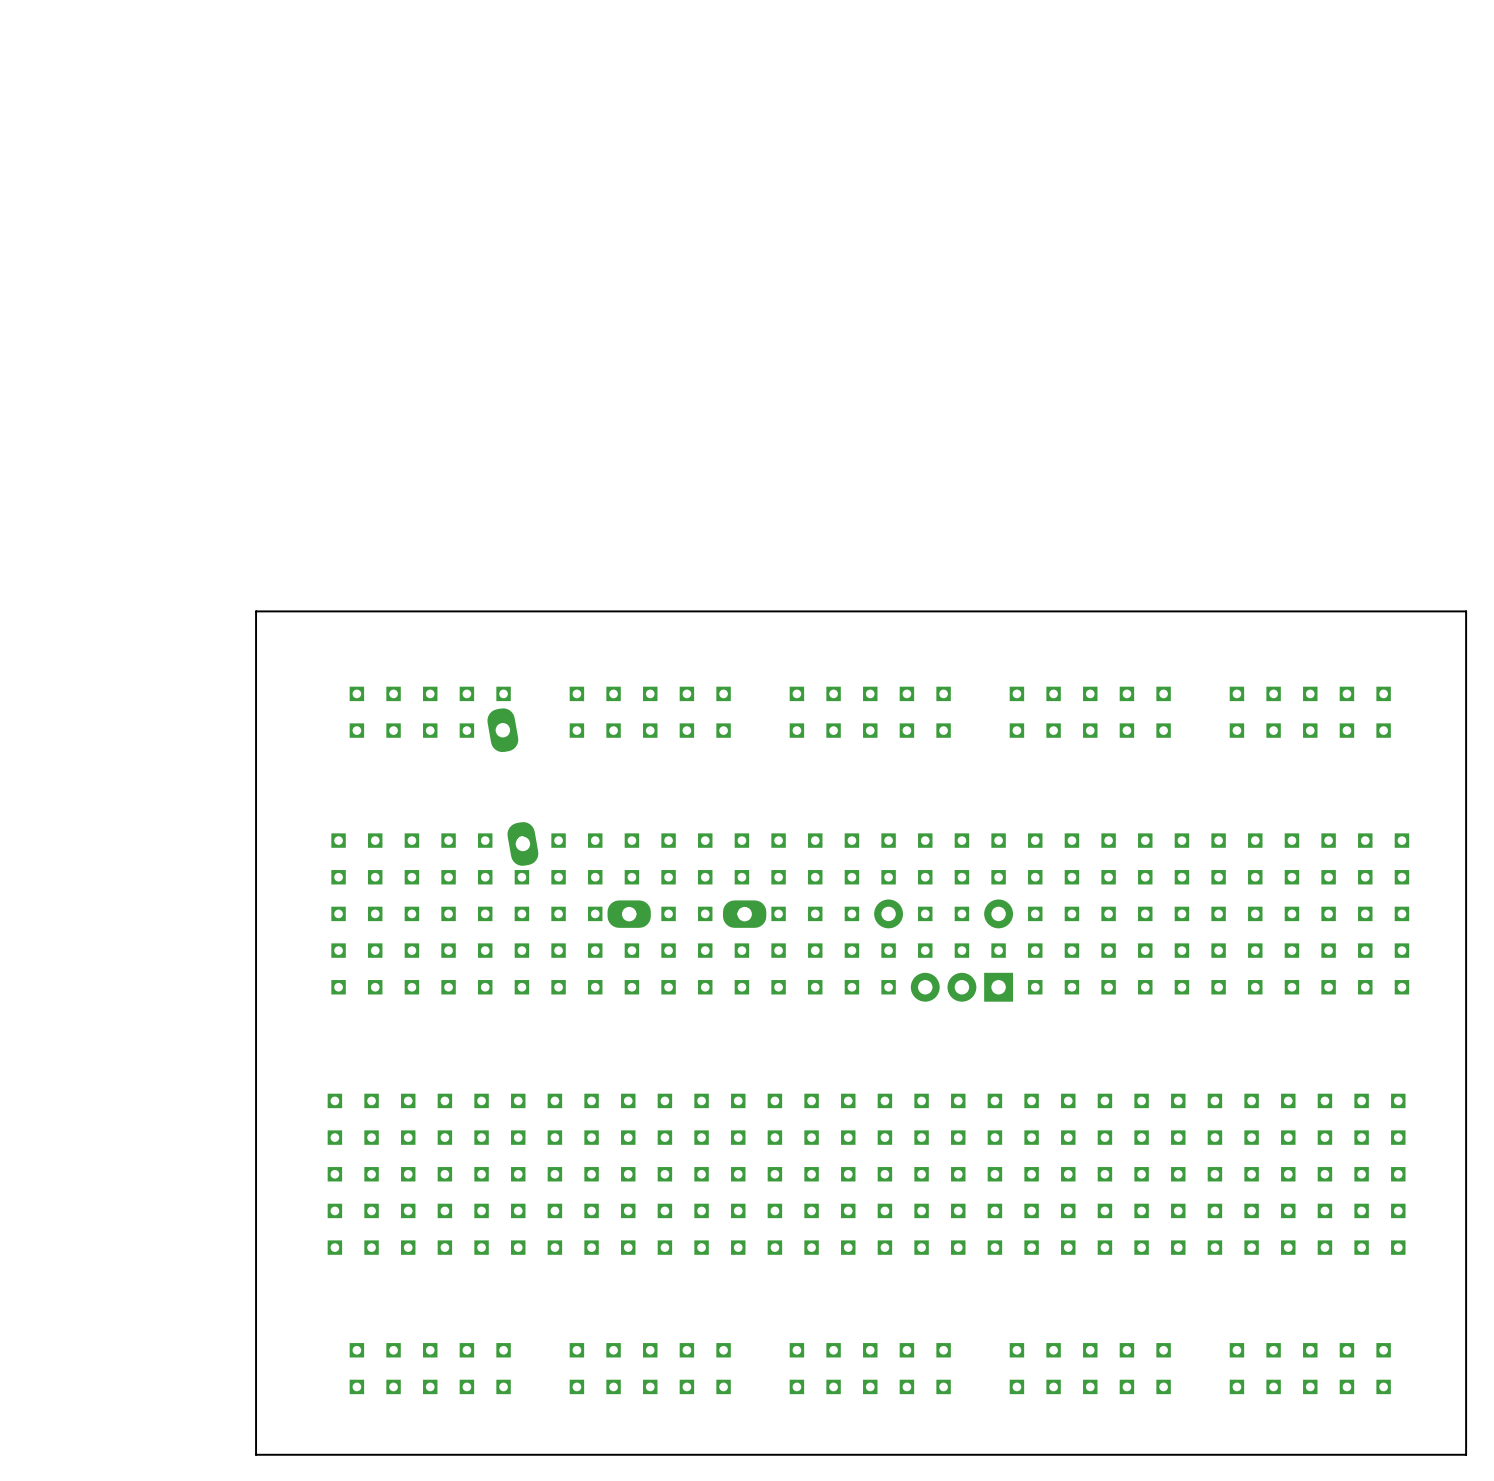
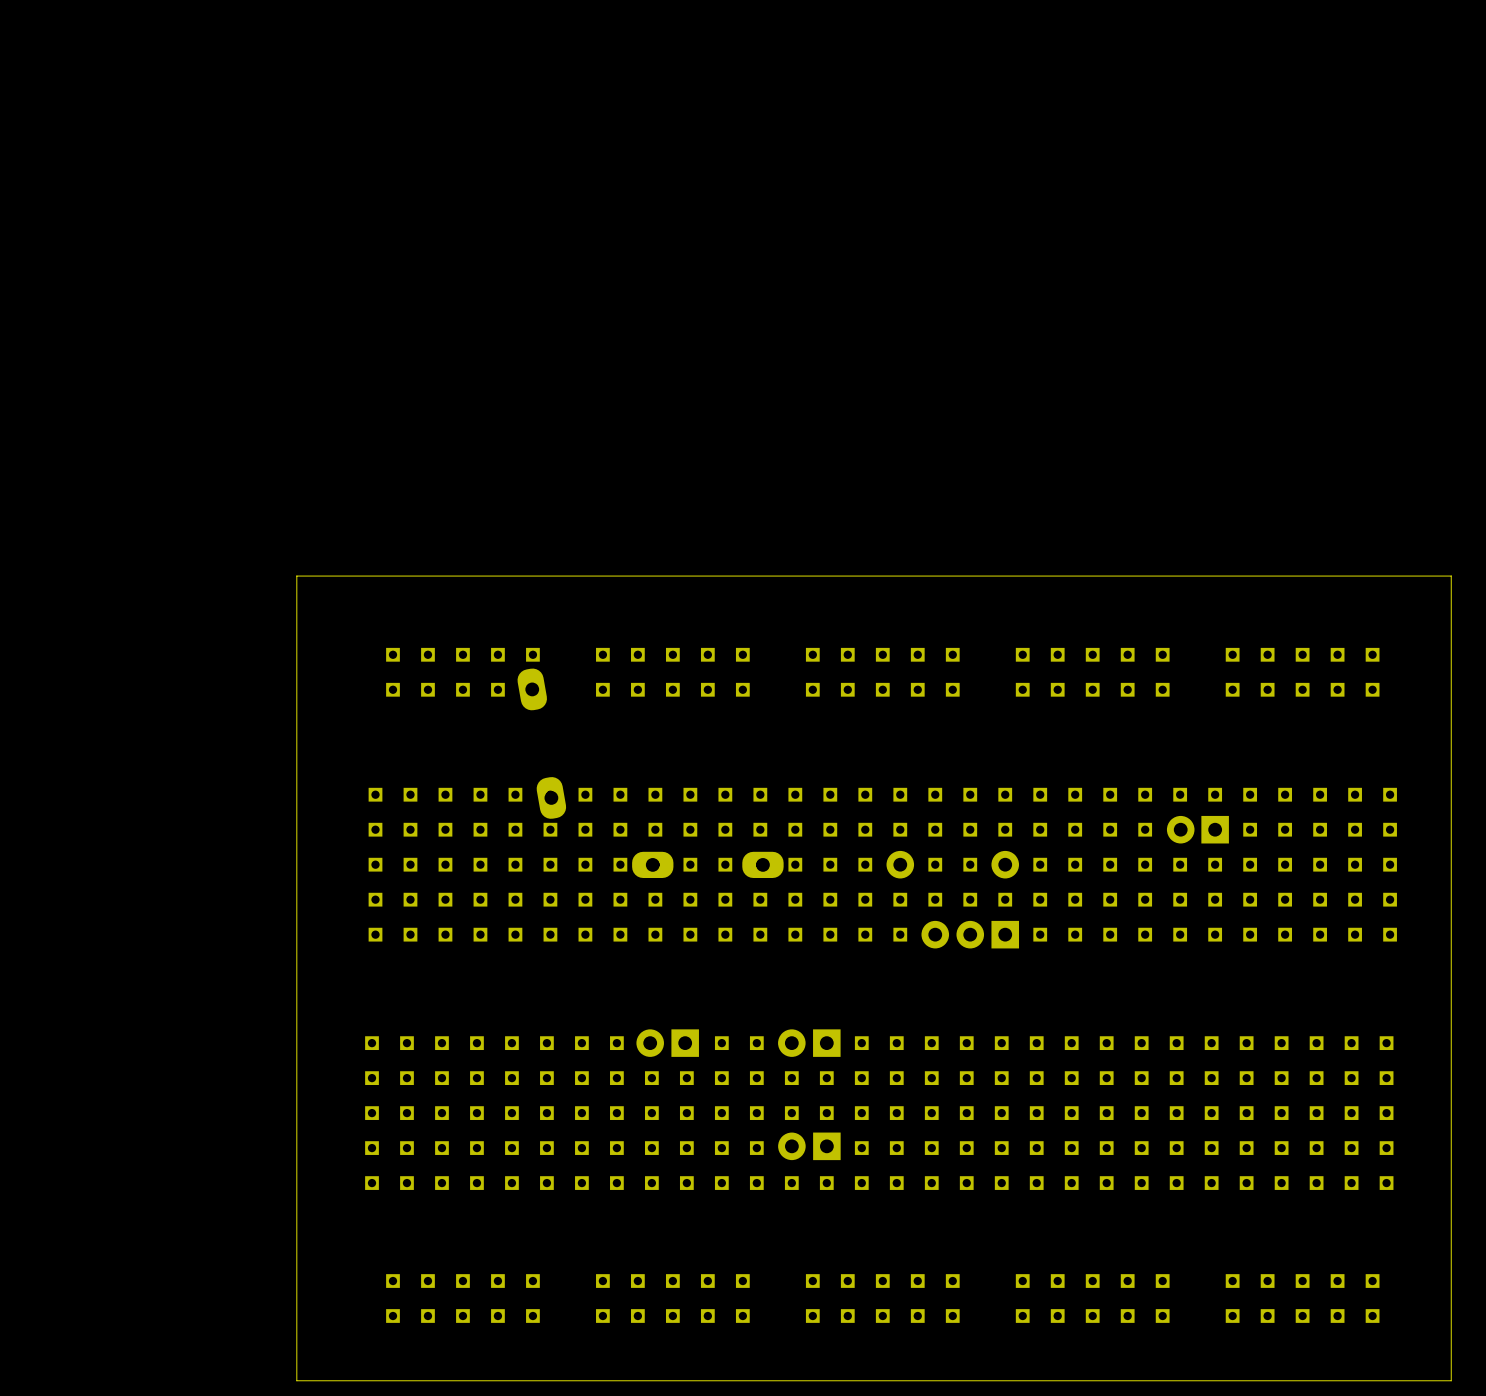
part: none -> (1197, 829)
part: none -> (667, 1043)
part: none -> (809, 1043)
part: none -> (809, 1146)

